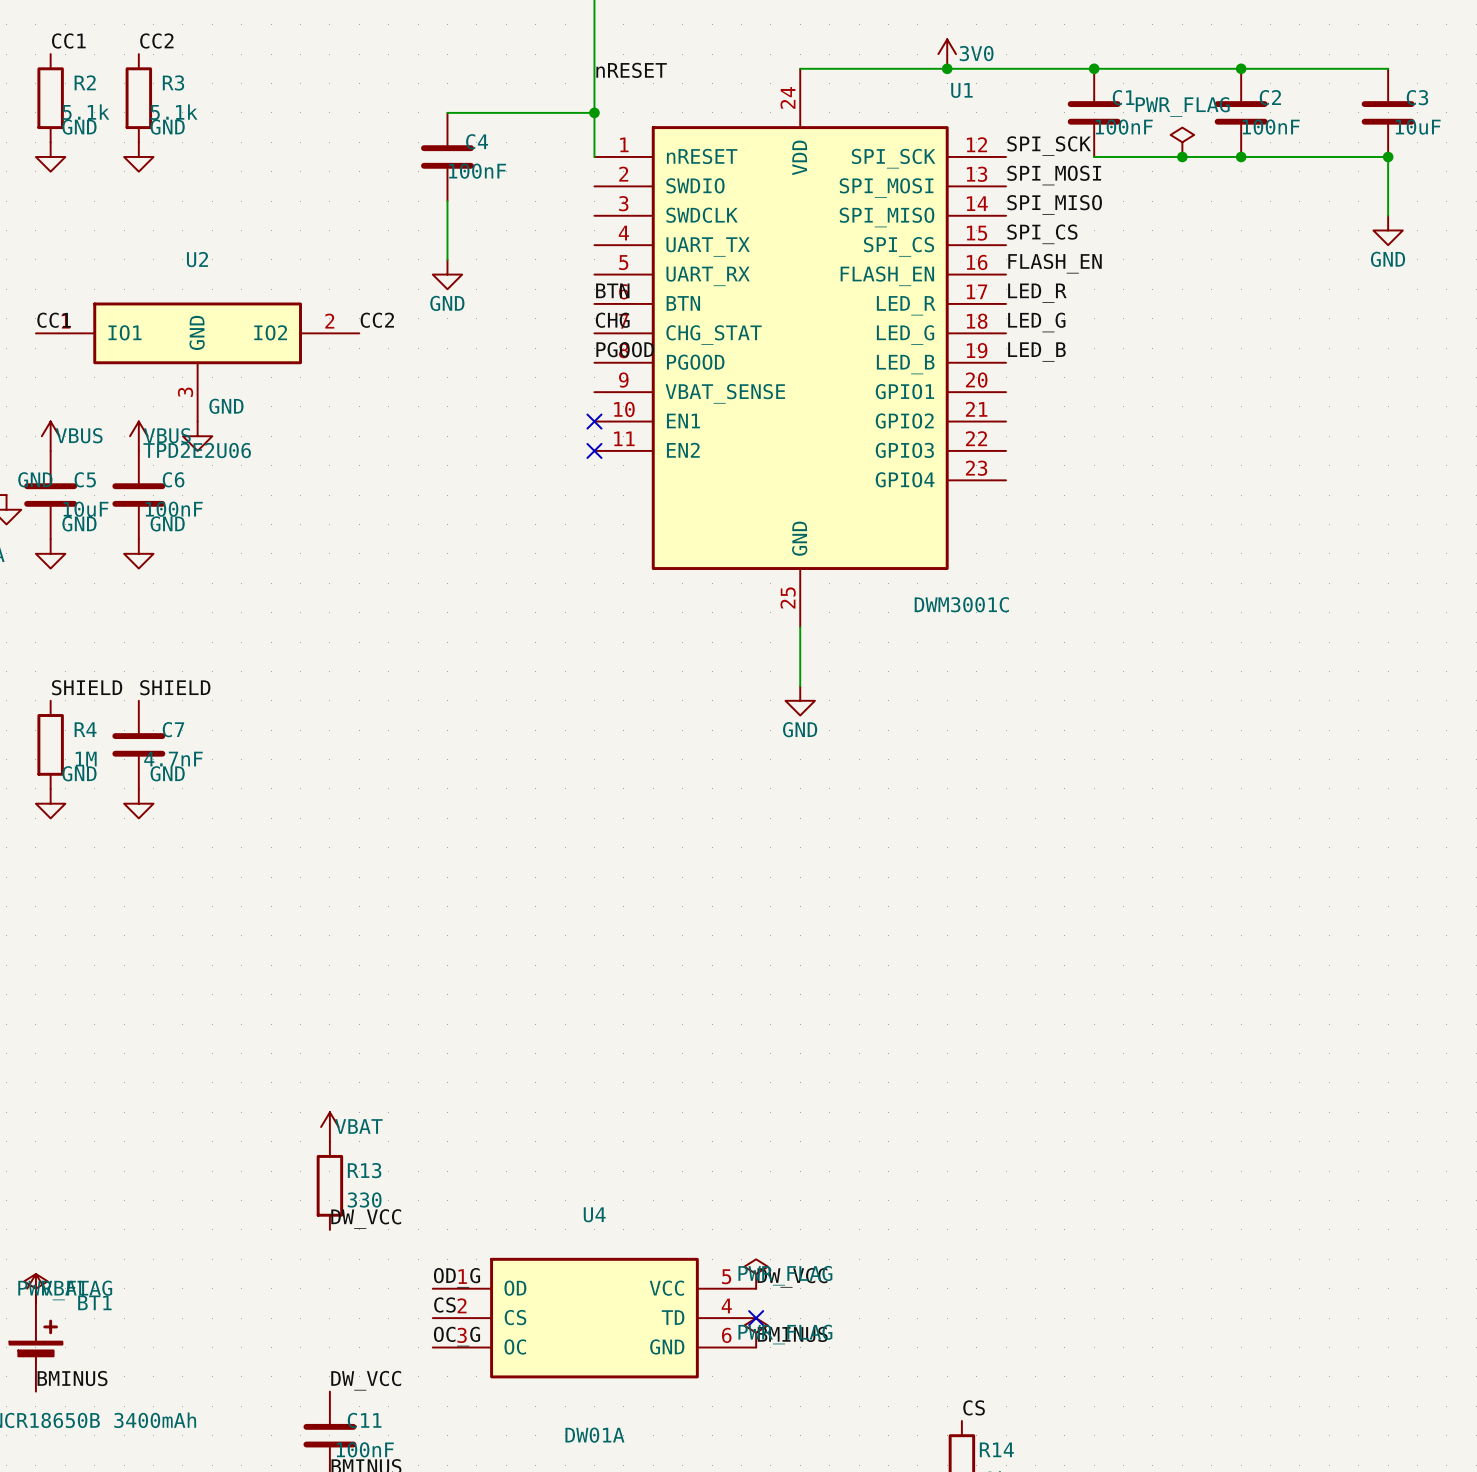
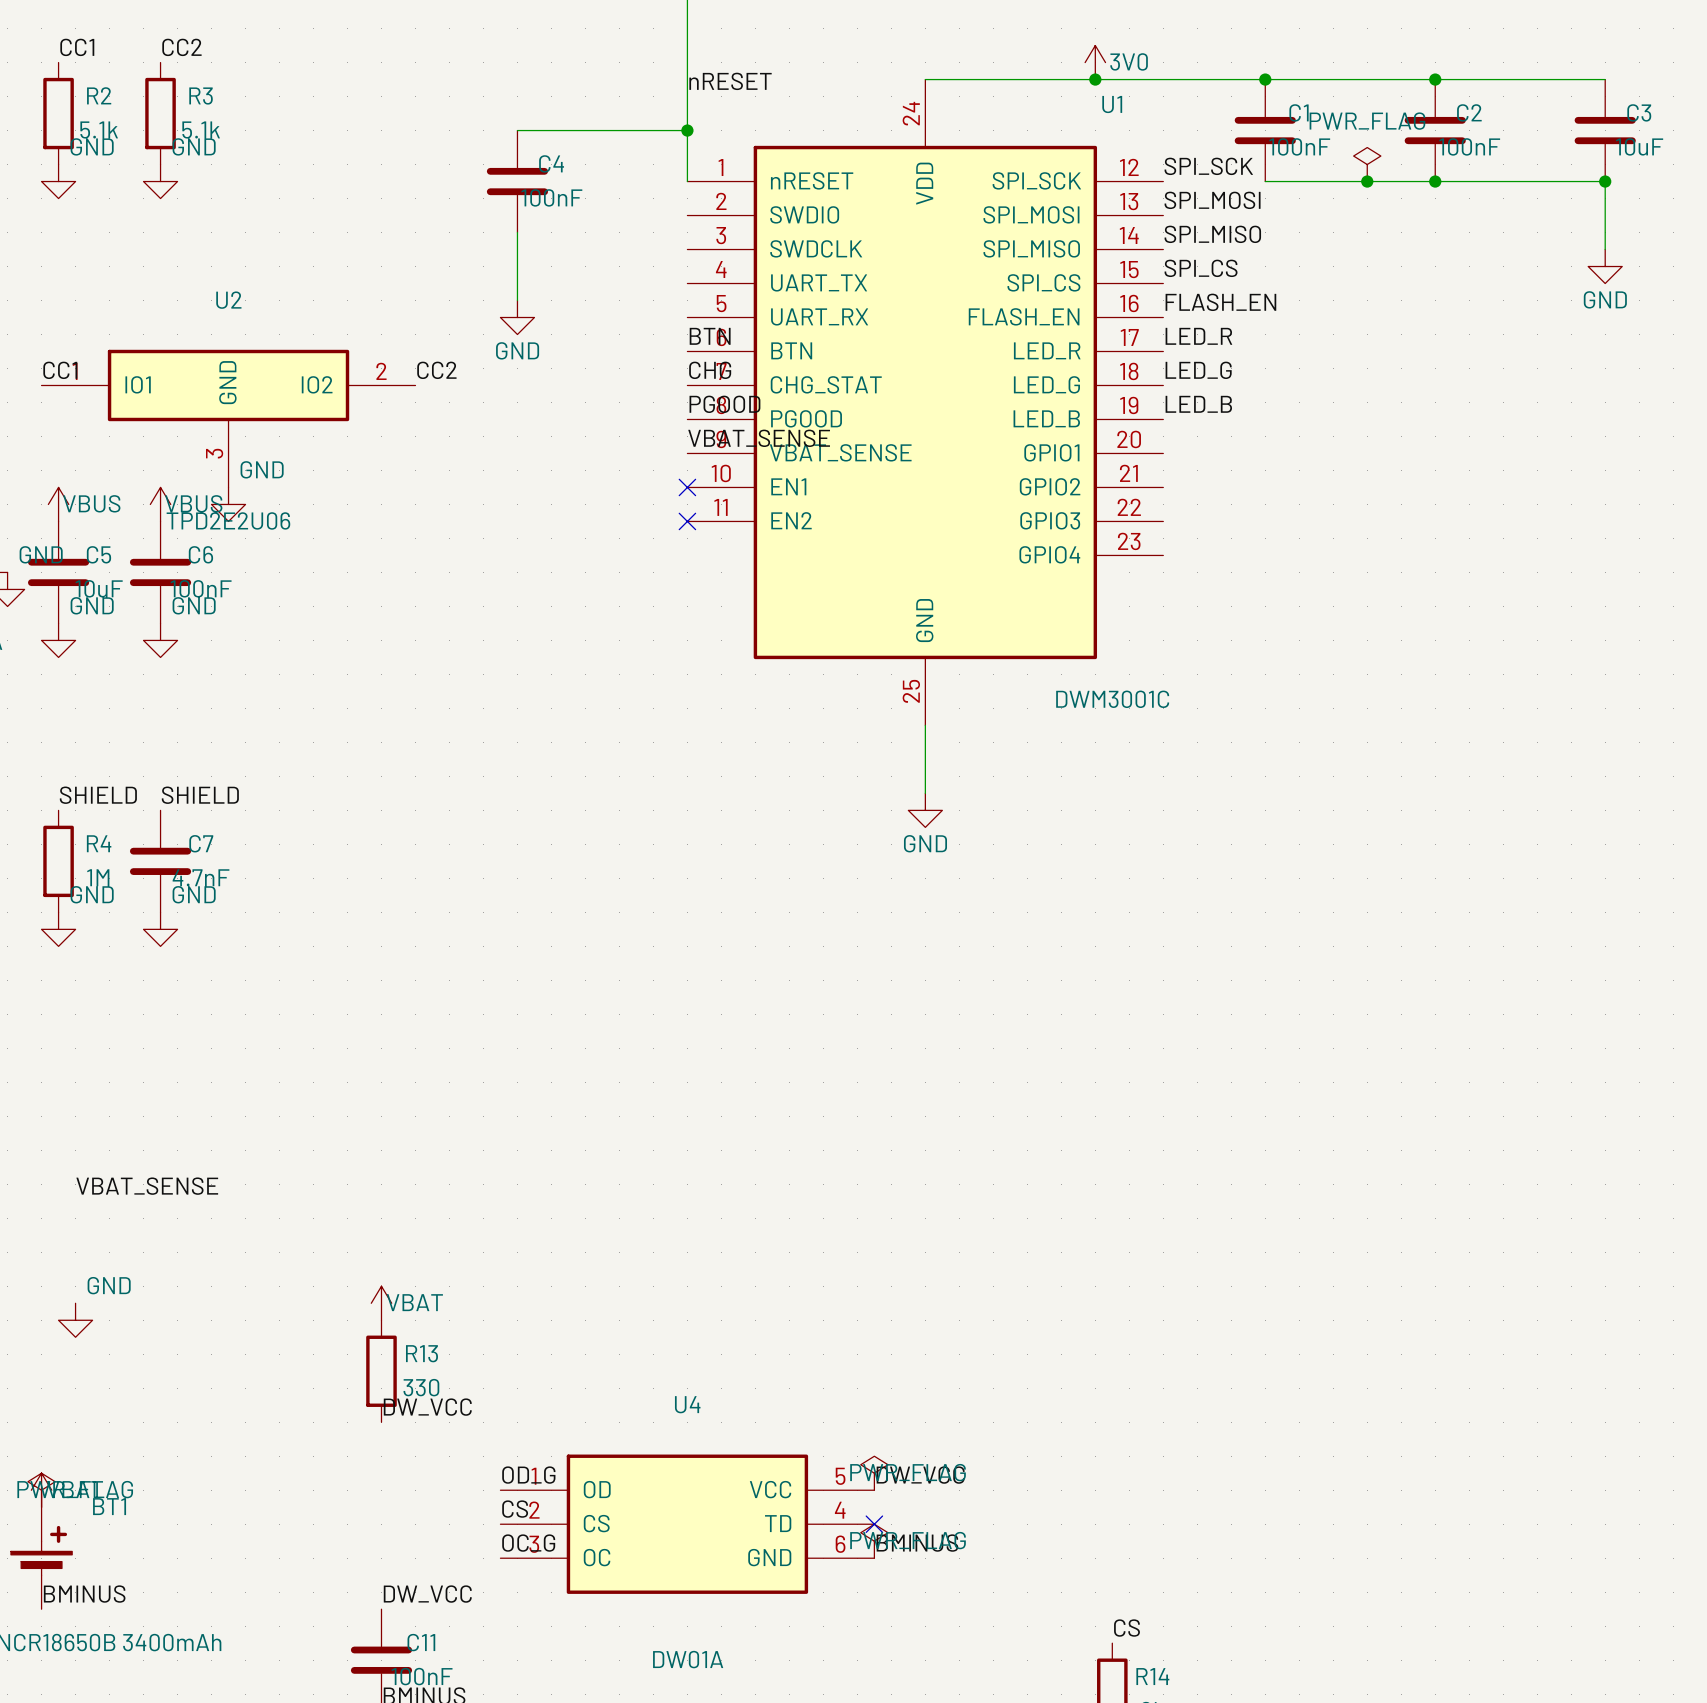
label: none -> VBAT_SENSE (759, 438)
label: none -> VBAT_SENSE (147, 1186)
power symbol: none -> GND (75, 1320)

